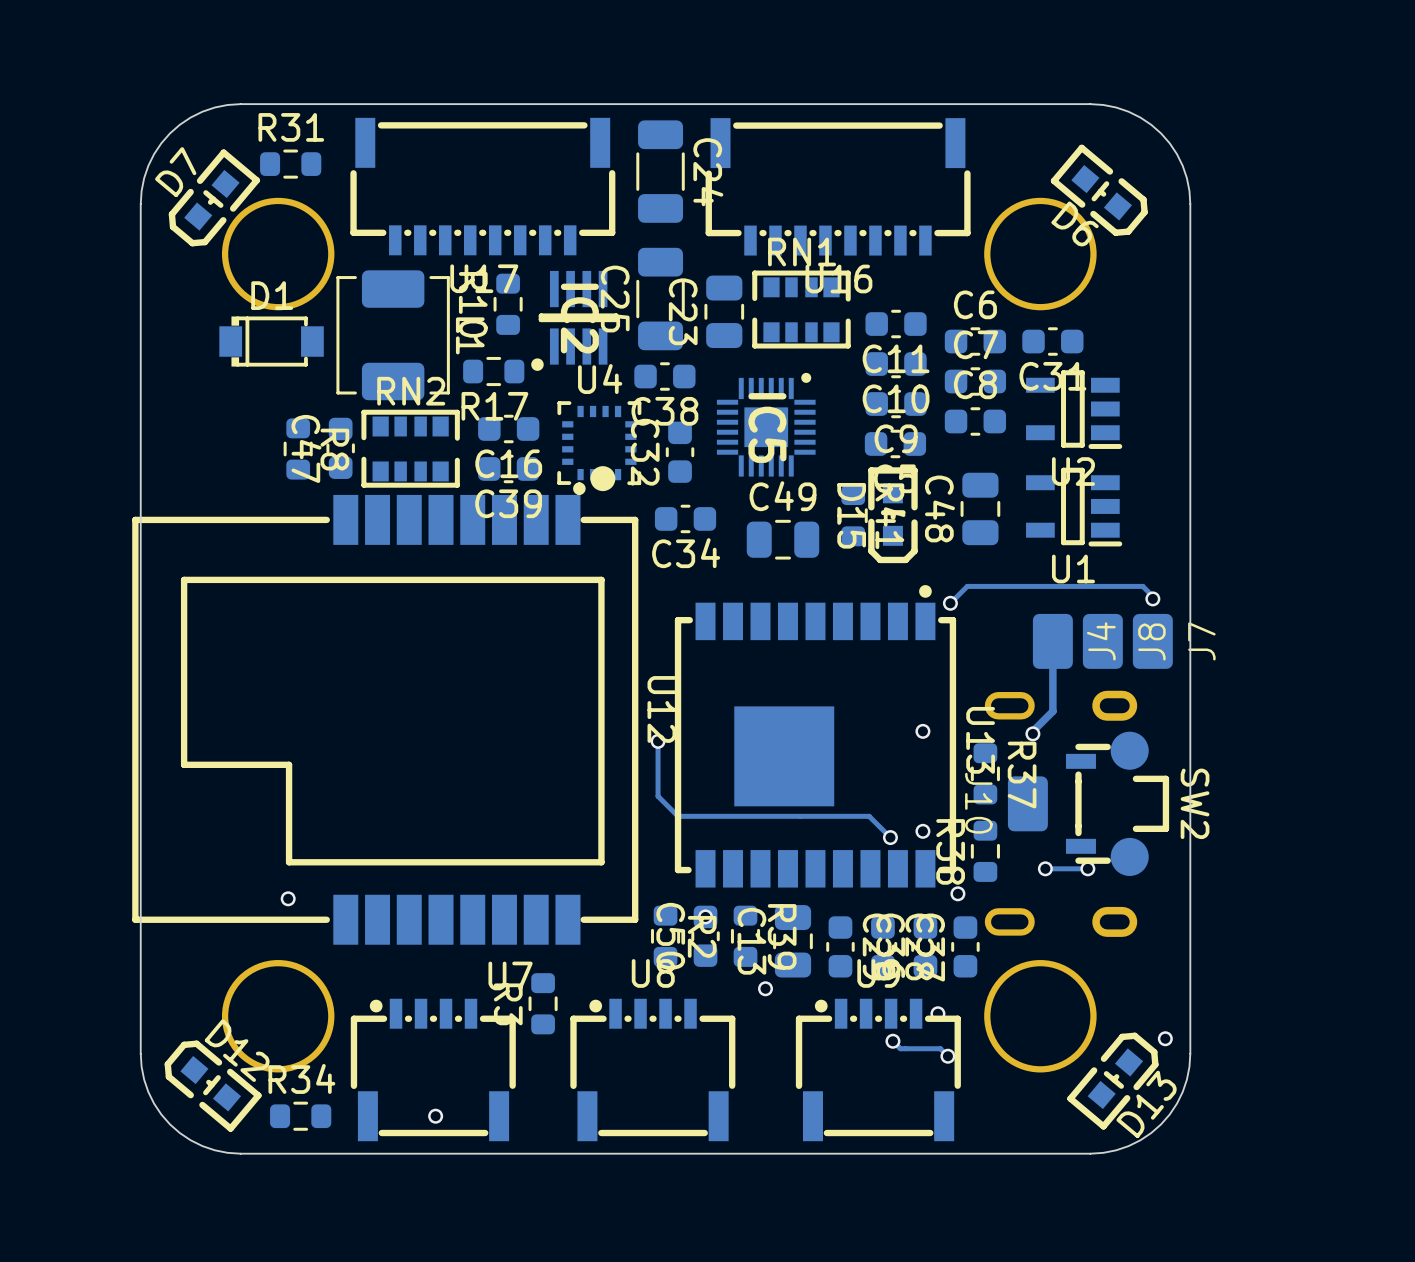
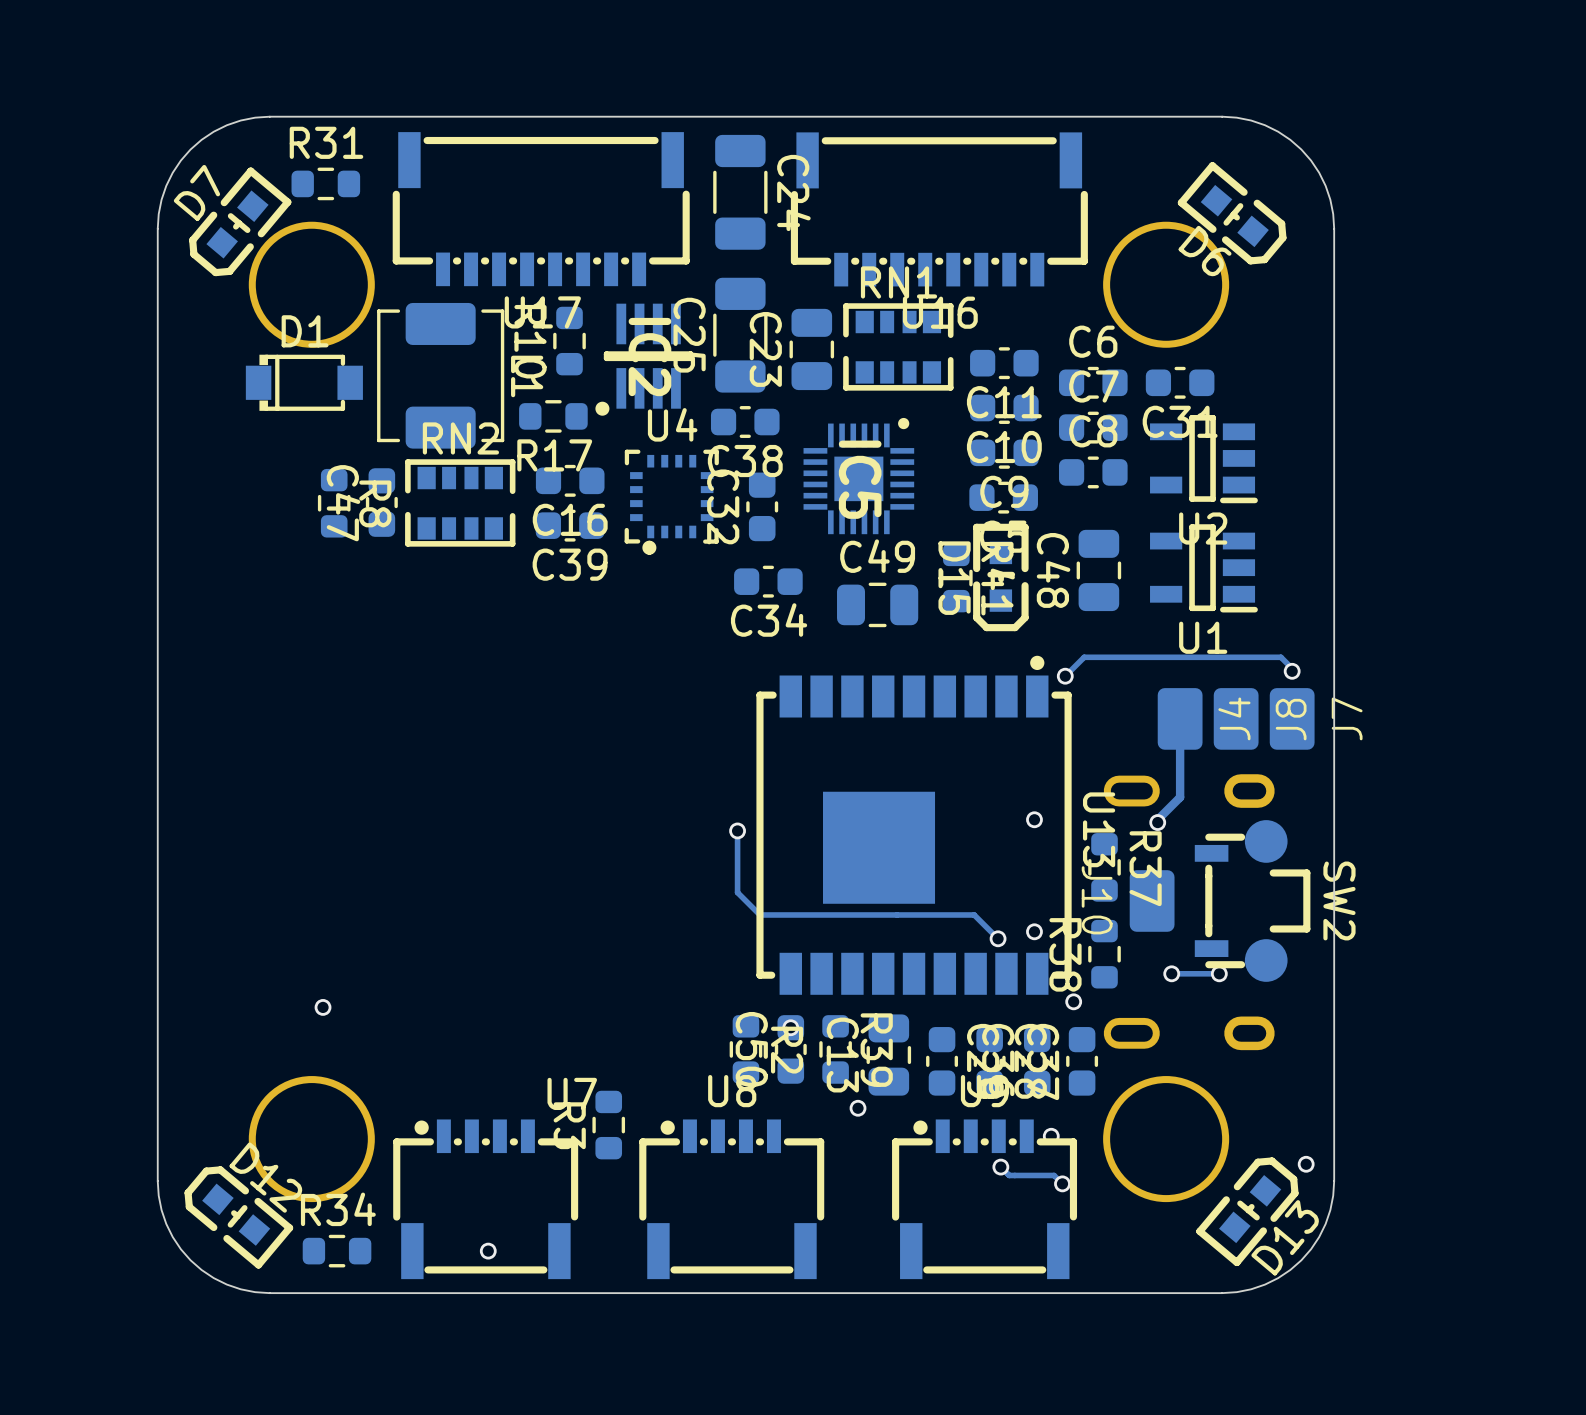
U12: (385, 705) -> none

